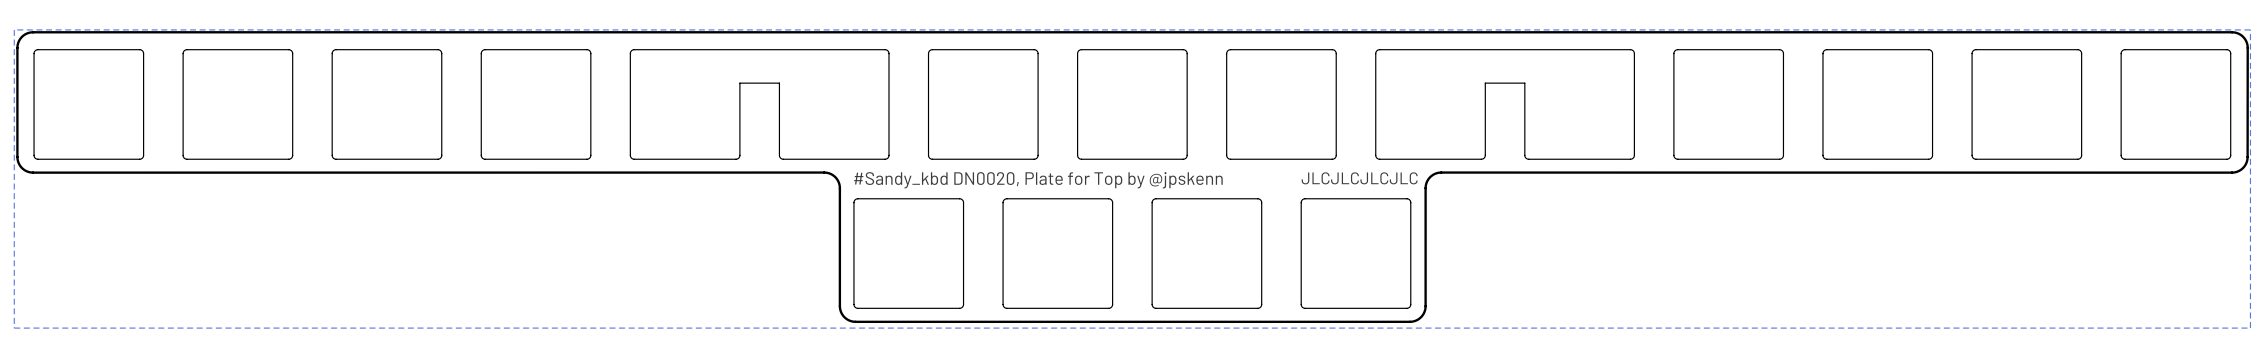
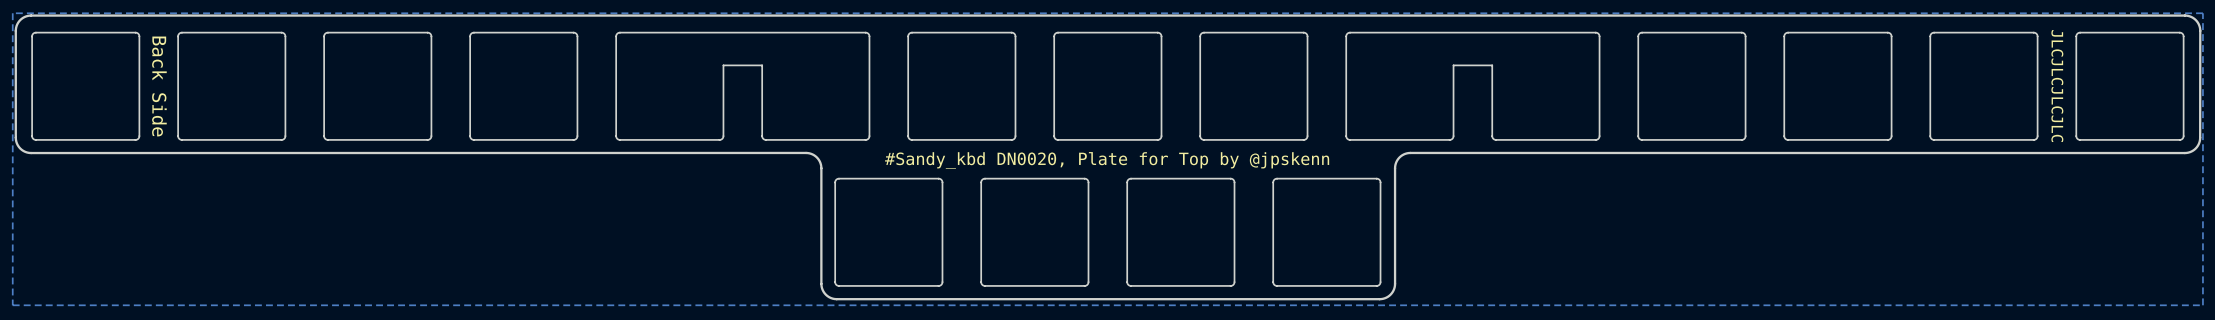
text: none -> Back Side (159, 86)
text: none -> JLCJLCJLCJLC (2057, 86)
text: JLCJLCJLCJLC (1359, 178) -> none
text: #Sandy_kbd DN0020, Plate for Top by @jpskenn (1038, 180) -> none
text: none -> #Sandy_kbd DN0020, Plate for Top by @jpskenn (1107, 160)

